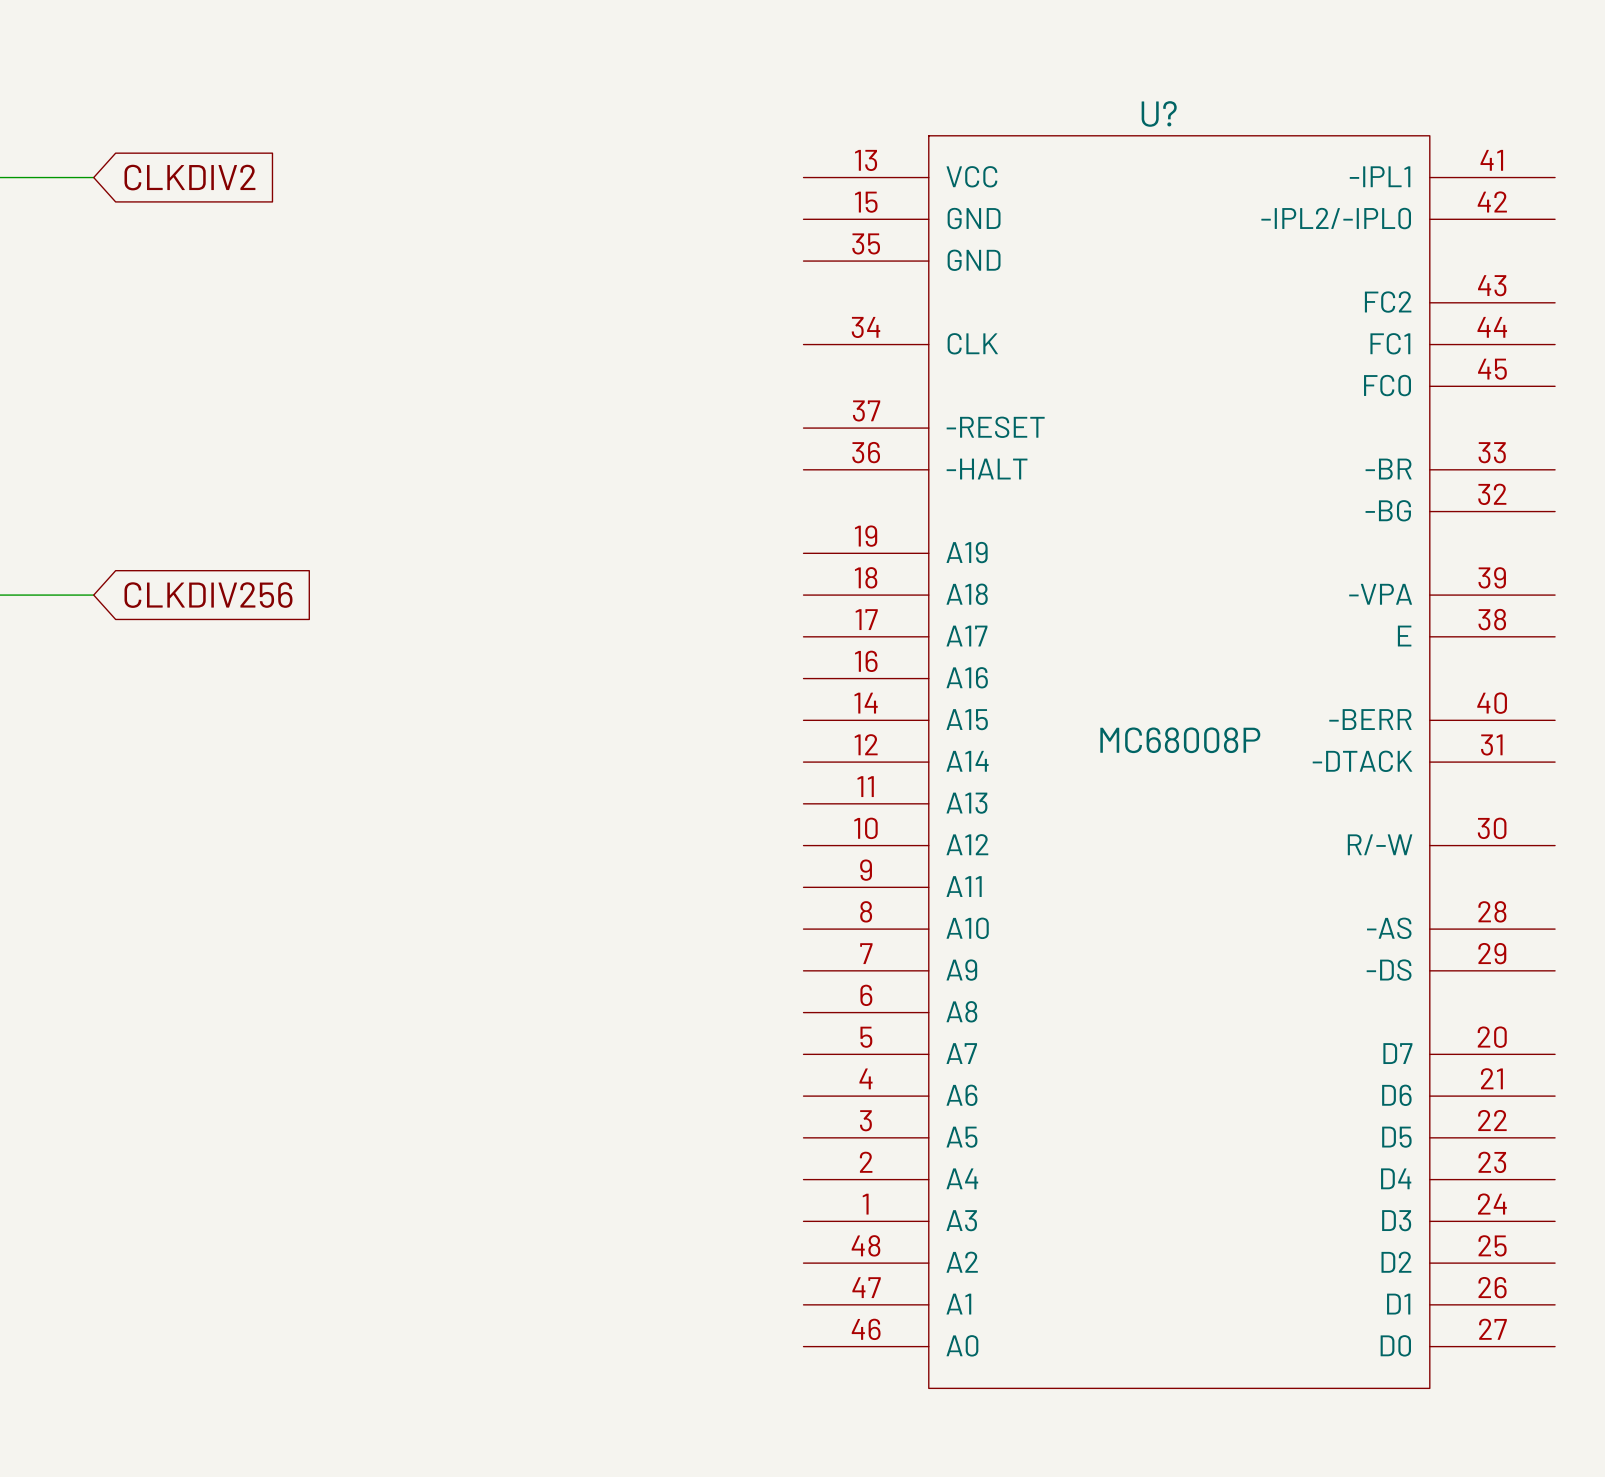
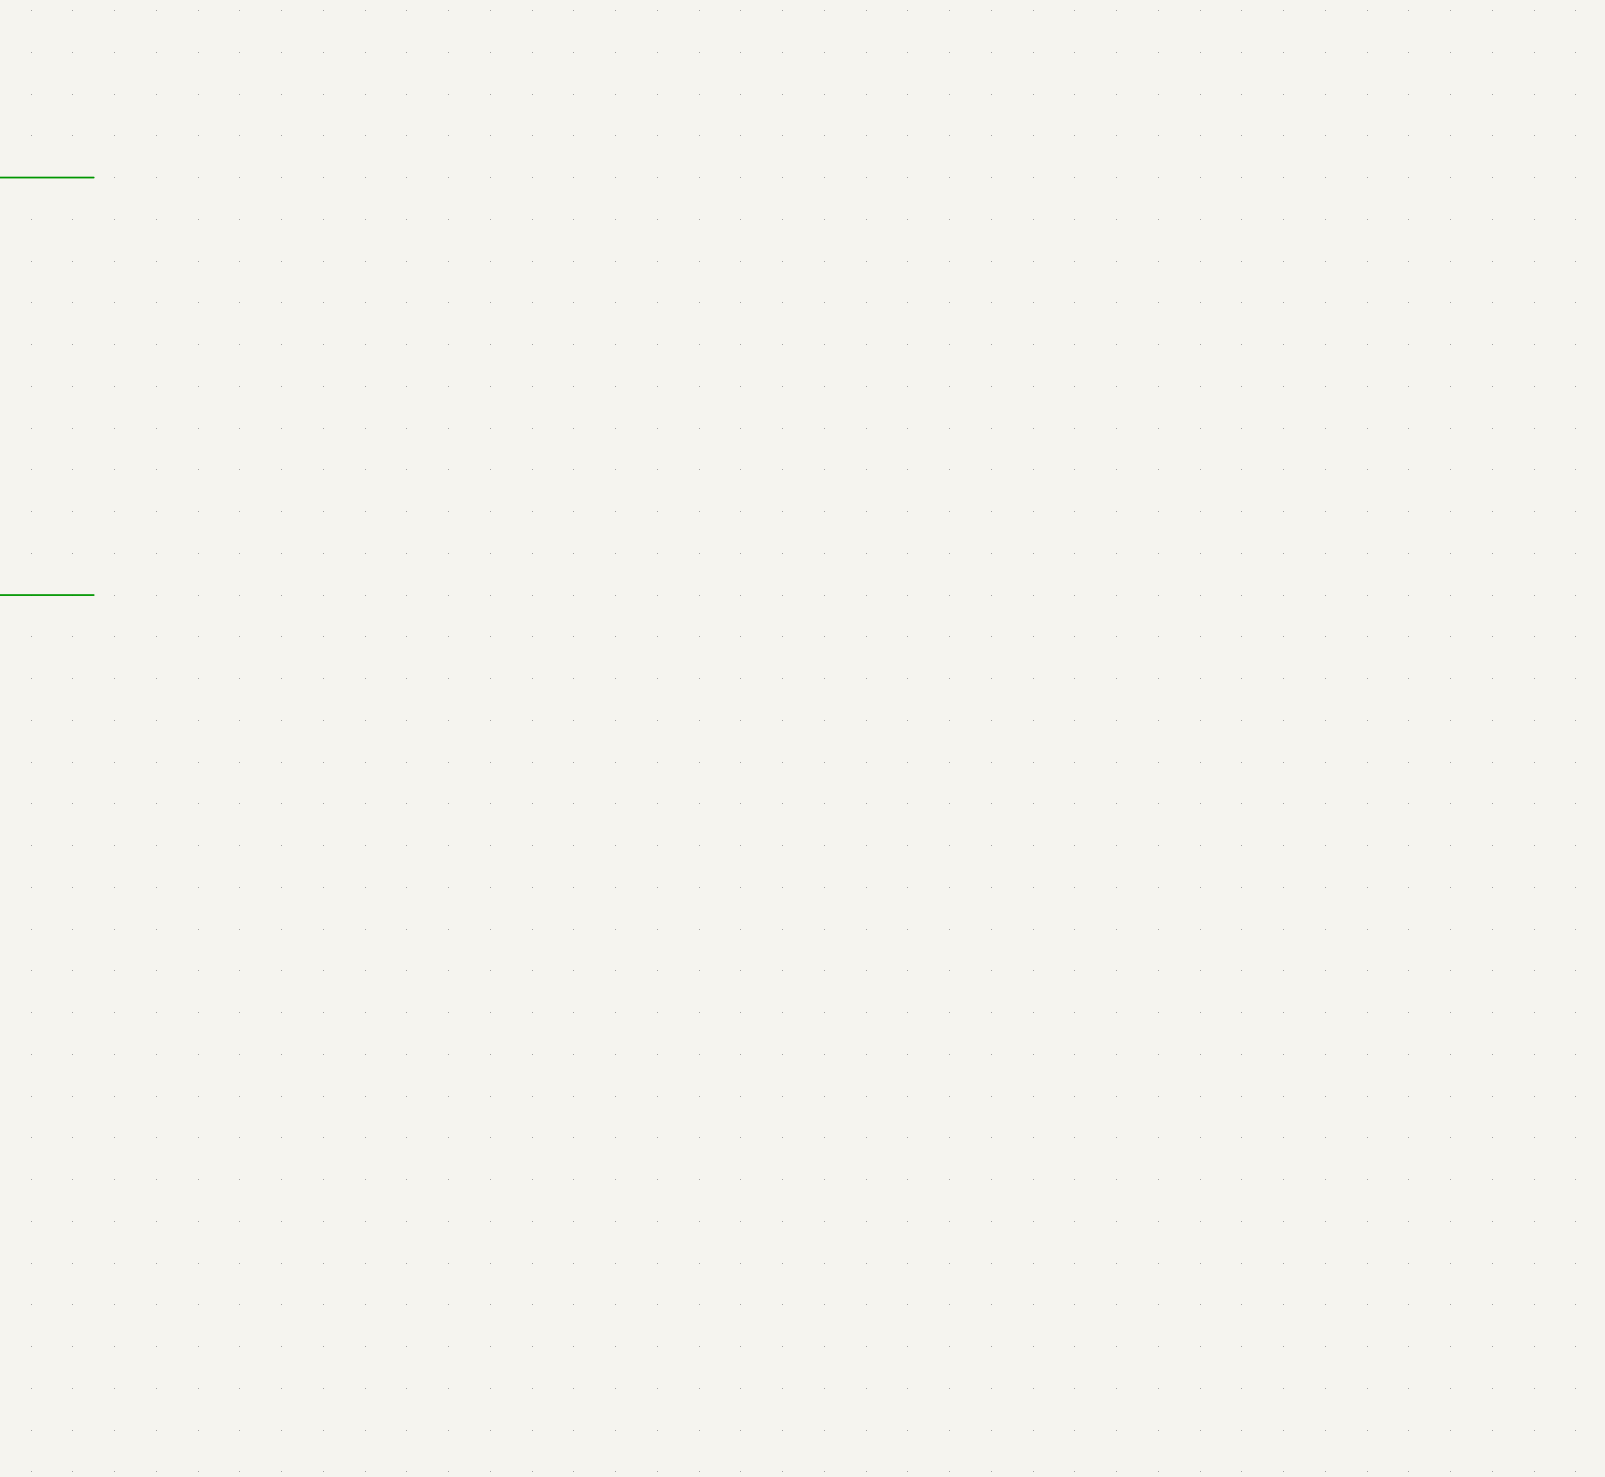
global label: CLKDIV2 (189, 177) -> none
global label: CLKDIV256 (208, 595) -> none
U?: MC68008P (1179, 762) -> none

